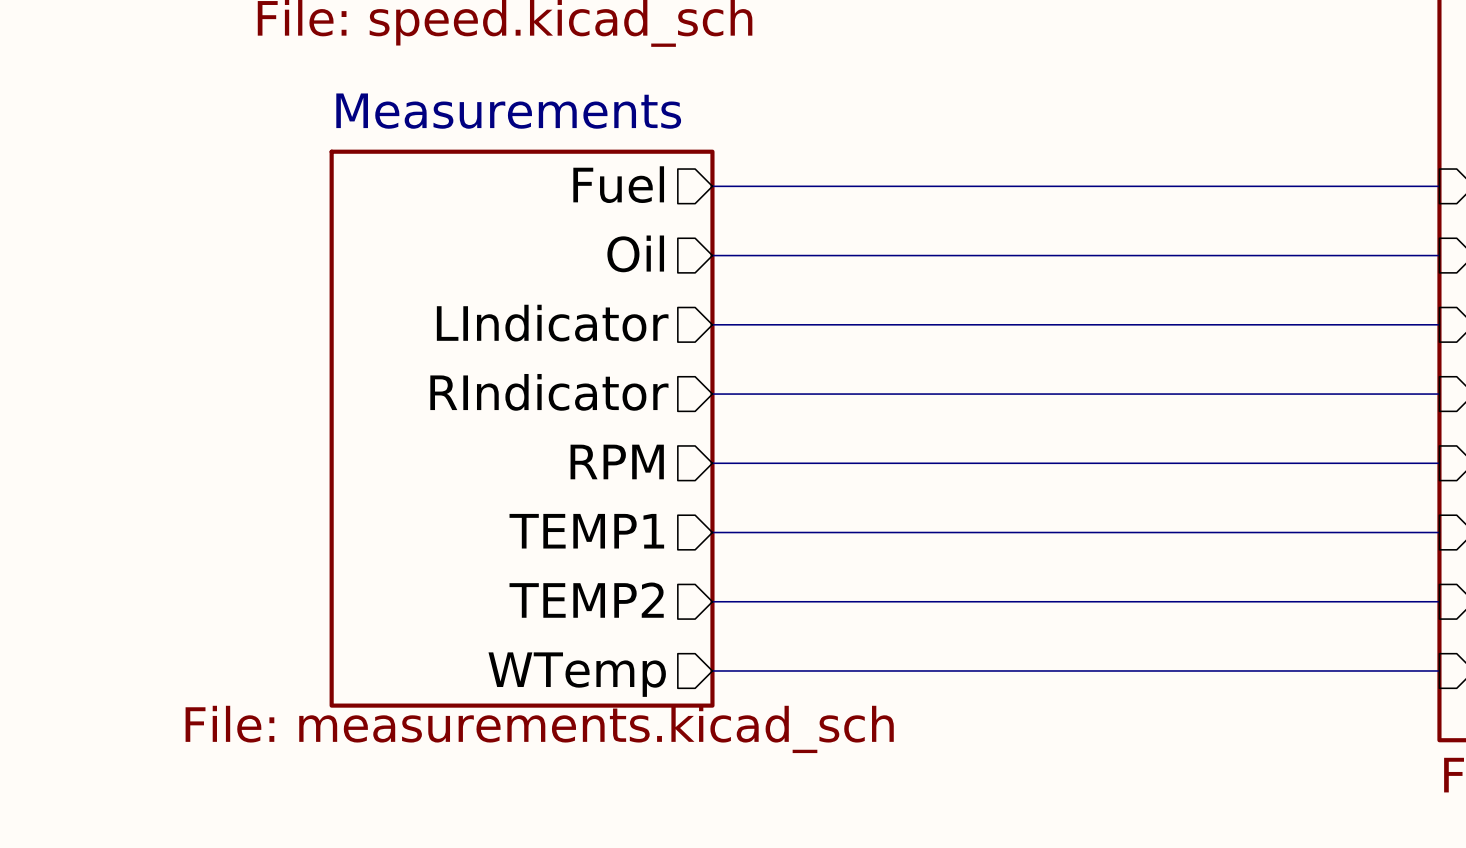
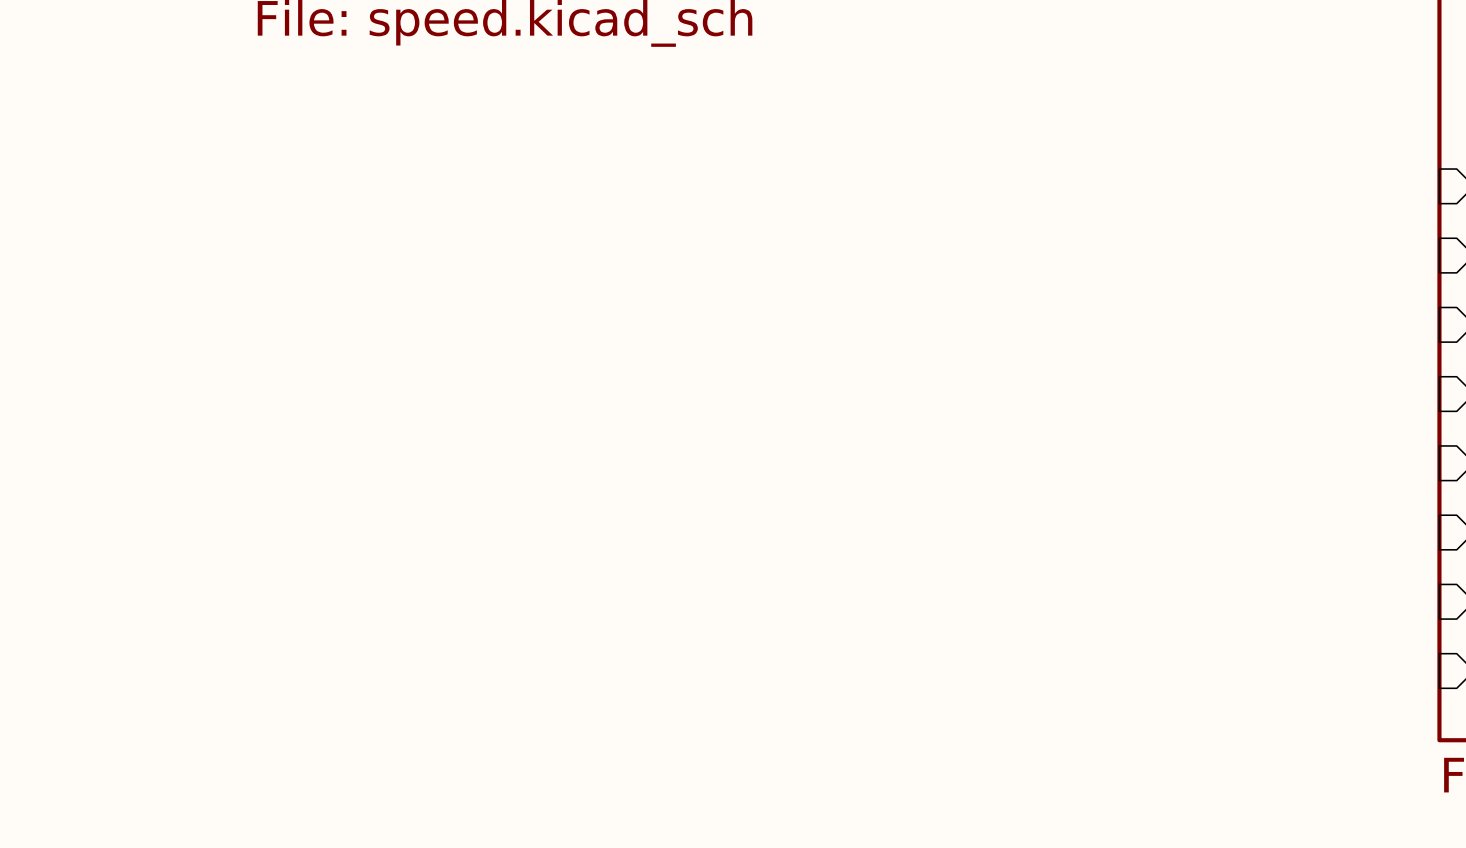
sheet pin: Fuel (618, 184) -> none
wire: (712, 186) (1439, 186) -> none
sheet pin: Oil (635, 253) -> none
wire: (712, 255) (1439, 255) -> none
sheet pin: LIndicator (552, 323) -> none
wire: (712, 324) (1439, 324) -> none
sheet pin: RIndicator (549, 392) -> none
wire: (712, 394) (1439, 394) -> none
sheet Measurements: File: measurements.kicad_sch (522, 428) -> none
sheet pin: RPM (617, 461) -> none
wire: (712, 463) (1439, 463) -> none
sheet pin: TEMP1 (586, 531) -> none
wire: (712, 532) (1439, 532) -> none
sheet pin: TEMP2 (586, 600) -> none
wire: (712, 601) (1439, 601) -> none
wire: (712, 670) (1439, 670) -> none
sheet pin: WTemp (577, 674) -> none

